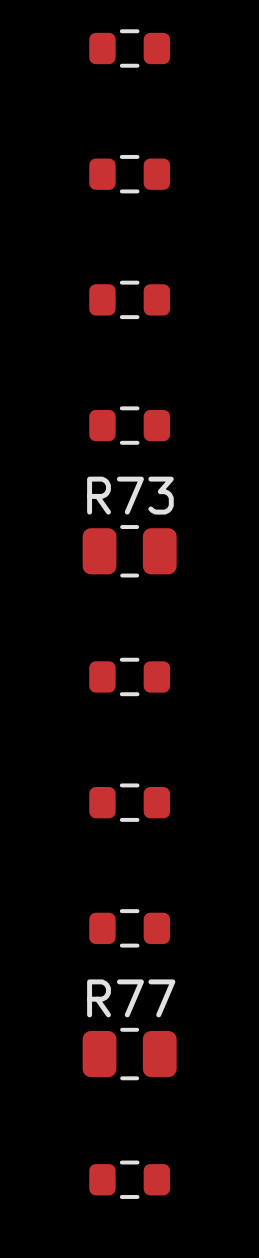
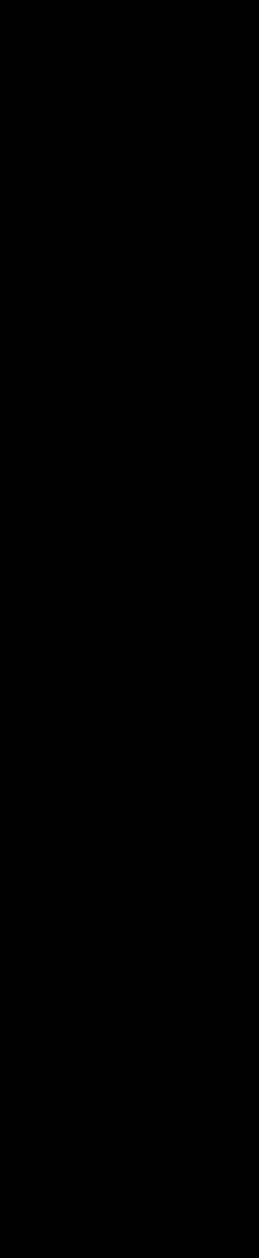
part: (129, 48) -> none
part: (129, 174) -> none
part: (129, 299) -> none
part: (129, 425) -> none
R73: (129, 551) -> none
part: (129, 676) -> none
part: (129, 802) -> none
part: (129, 928) -> none
R77: (129, 1054) -> none
part: (129, 1179) -> none

